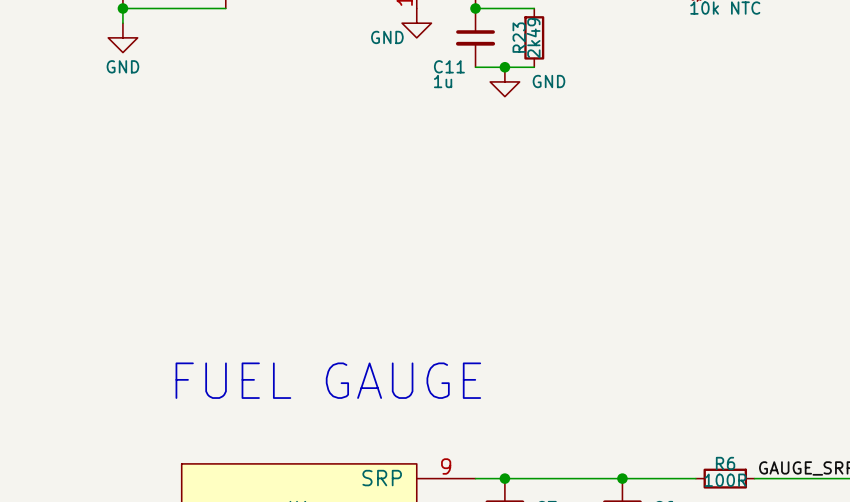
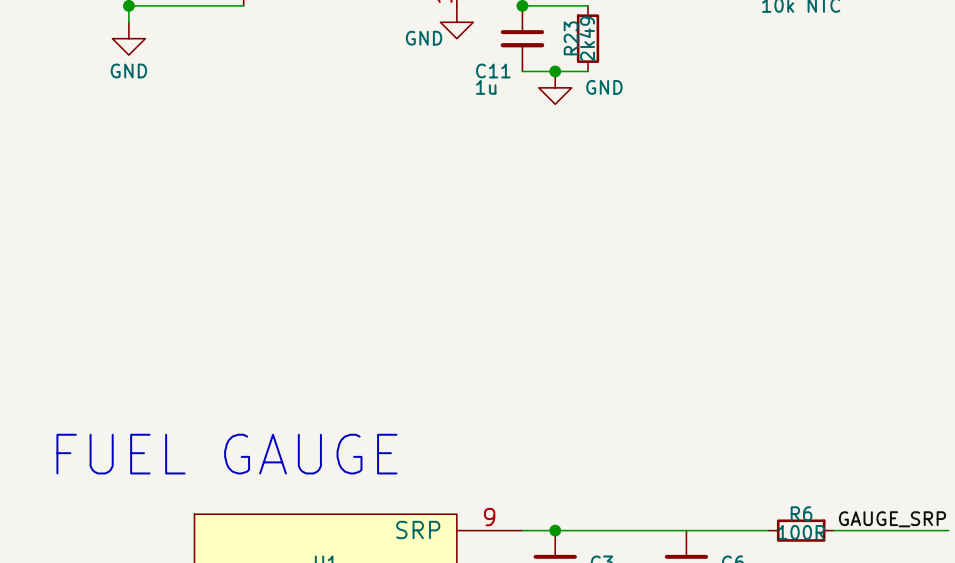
text position: FUEL GAUGE (328, 380) -> FUEL GAUGE (226, 454)
junction: (622, 478) -> none

